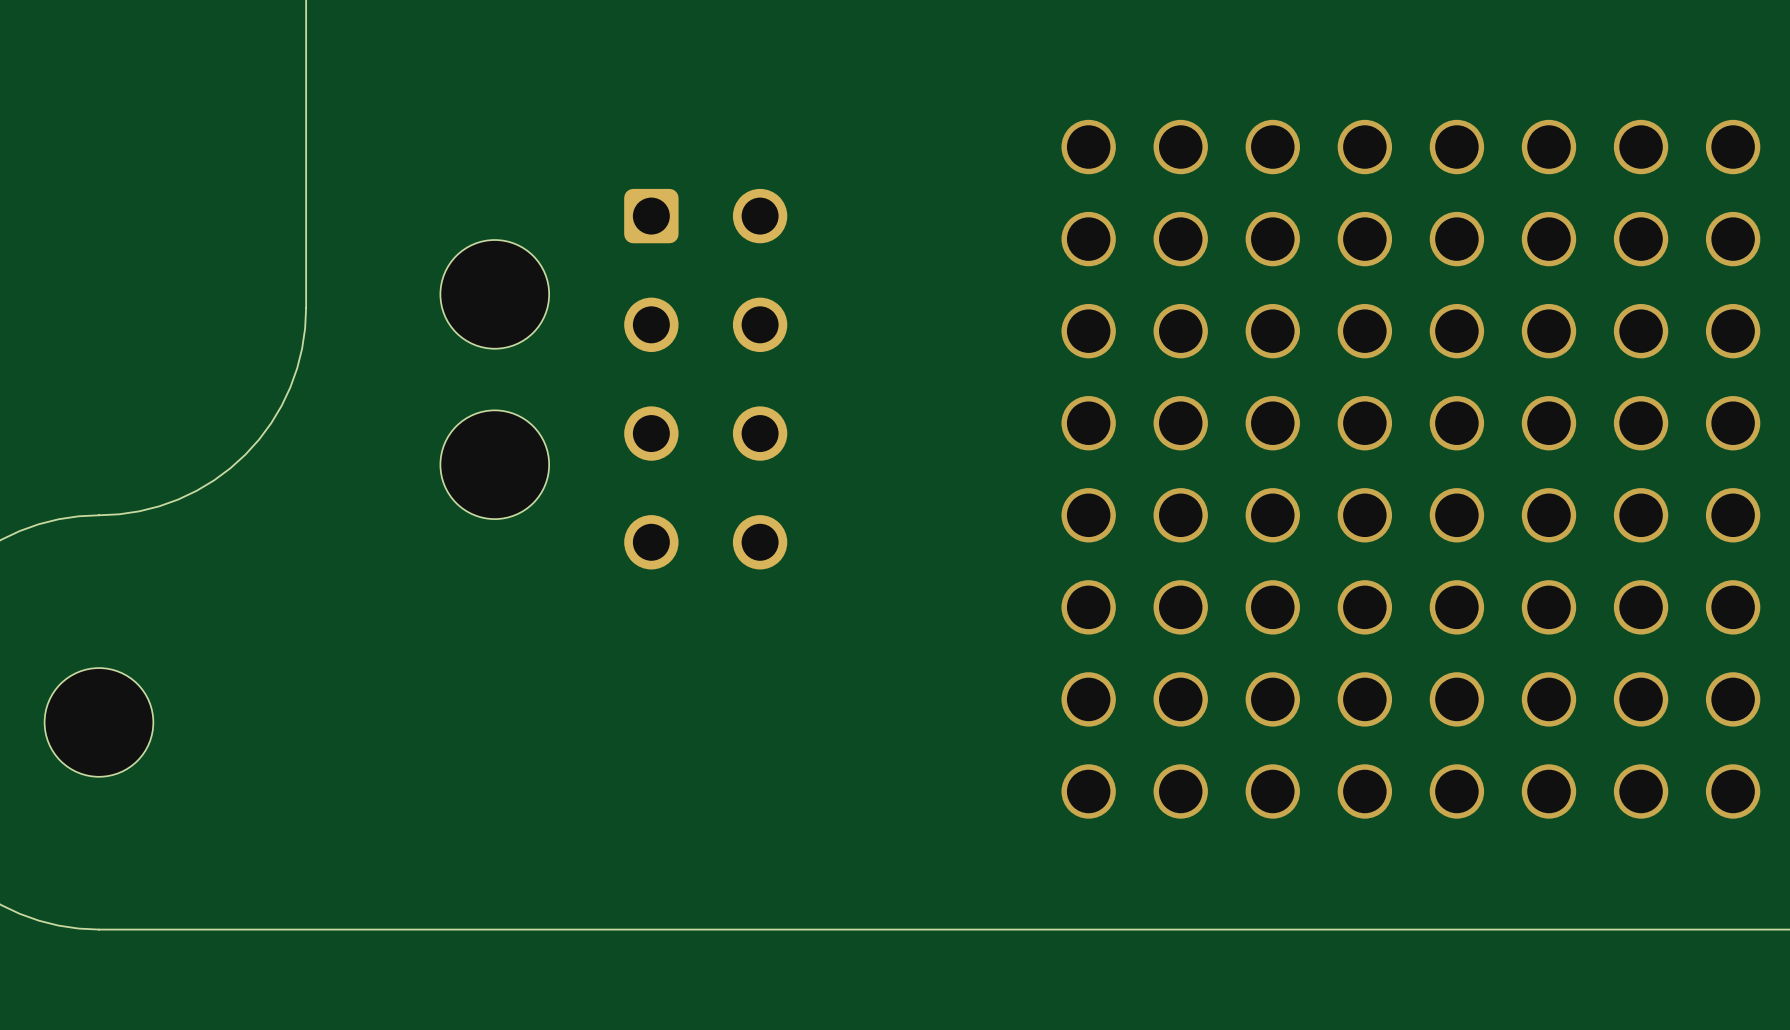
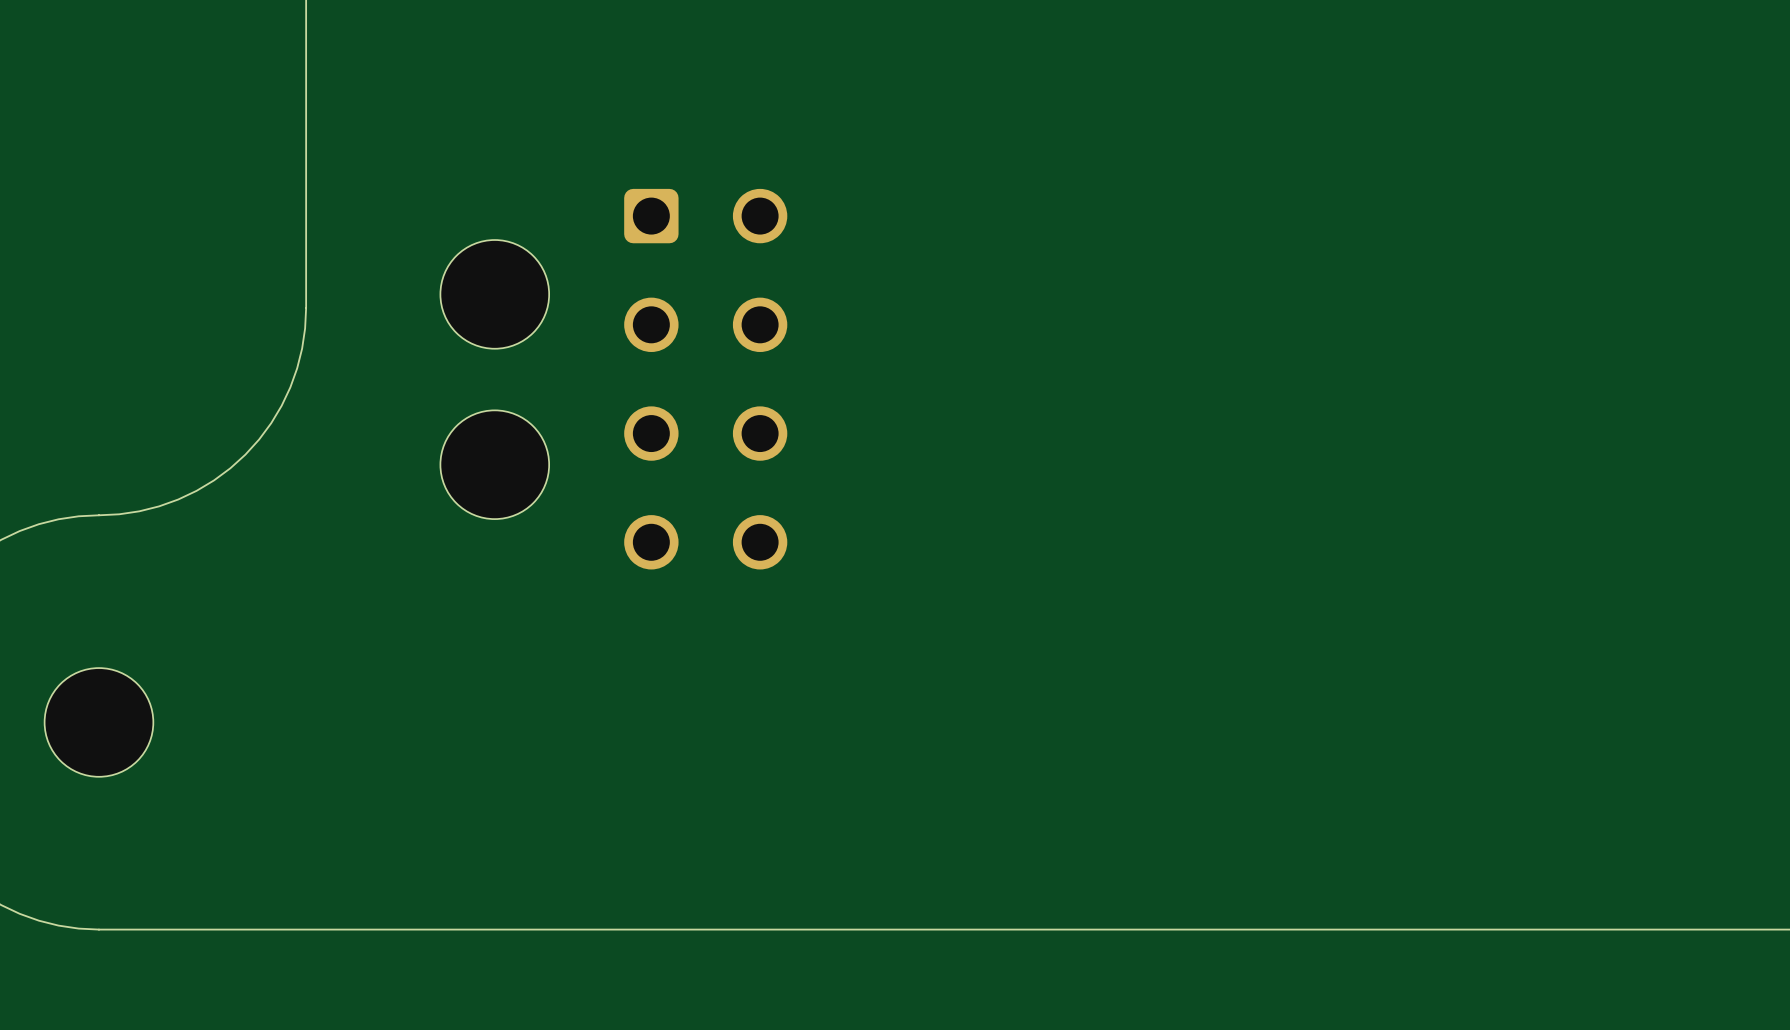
via: (1088, 147) -> none
via: (1180, 147) -> none
via: (1272, 147) -> none
via: (1364, 147) -> none
via: (1456, 147) -> none
via: (1548, 147) -> none
via: (1641, 147) -> none
via: (1733, 147) -> none
via: (1088, 239) -> none
via: (1180, 239) -> none
via: (1272, 239) -> none
via: (1364, 239) -> none
via: (1456, 239) -> none
via: (1548, 239) -> none
via: (1641, 239) -> none
via: (1733, 239) -> none
via: (1088, 331) -> none
via: (1180, 331) -> none
via: (1272, 331) -> none
via: (1364, 331) -> none
via: (1456, 331) -> none
via: (1548, 331) -> none
via: (1641, 331) -> none
via: (1733, 331) -> none
via: (1088, 423) -> none
via: (1180, 423) -> none
via: (1272, 423) -> none
via: (1364, 423) -> none
via: (1456, 423) -> none
via: (1548, 423) -> none
via: (1641, 423) -> none
via: (1733, 423) -> none
via: (1088, 515) -> none
via: (1180, 515) -> none
via: (1272, 515) -> none
via: (1364, 515) -> none
via: (1456, 515) -> none
via: (1548, 515) -> none
via: (1641, 515) -> none
via: (1733, 515) -> none
via: (1088, 607) -> none
via: (1180, 607) -> none
via: (1272, 607) -> none
via: (1364, 607) -> none
via: (1456, 607) -> none
via: (1548, 607) -> none
via: (1641, 607) -> none
via: (1733, 607) -> none
via: (1088, 699) -> none
via: (1180, 699) -> none
via: (1272, 699) -> none
via: (1364, 699) -> none
via: (1456, 699) -> none
via: (1548, 699) -> none
via: (1641, 699) -> none
via: (1733, 699) -> none
via: (1088, 791) -> none
via: (1180, 791) -> none
via: (1272, 791) -> none
via: (1364, 791) -> none
via: (1456, 791) -> none
via: (1548, 791) -> none
via: (1641, 791) -> none
via: (1733, 791) -> none

